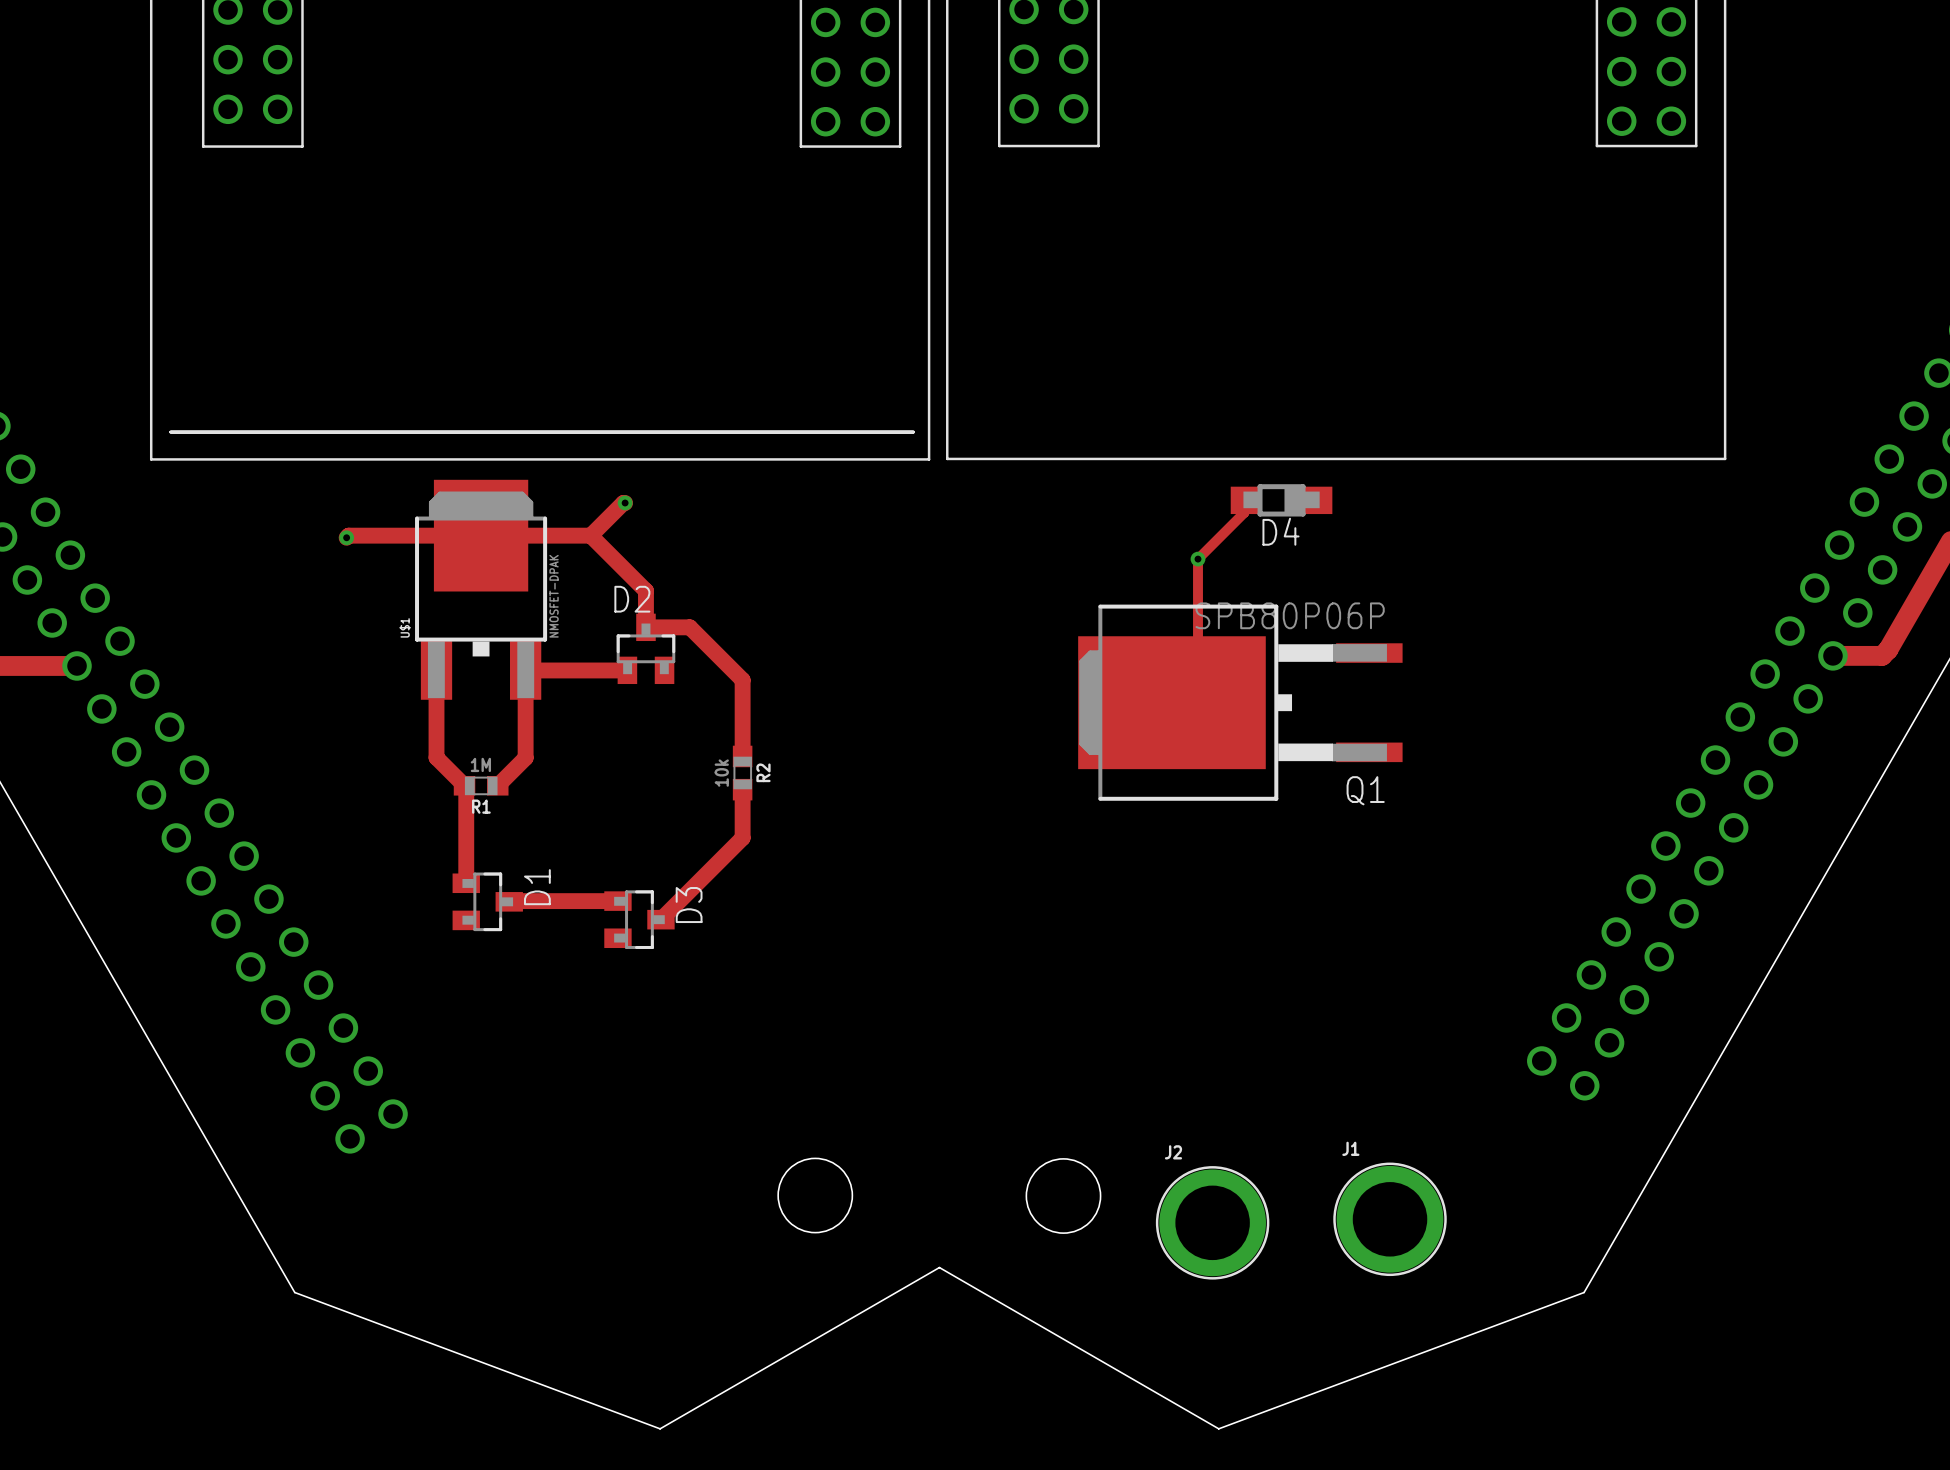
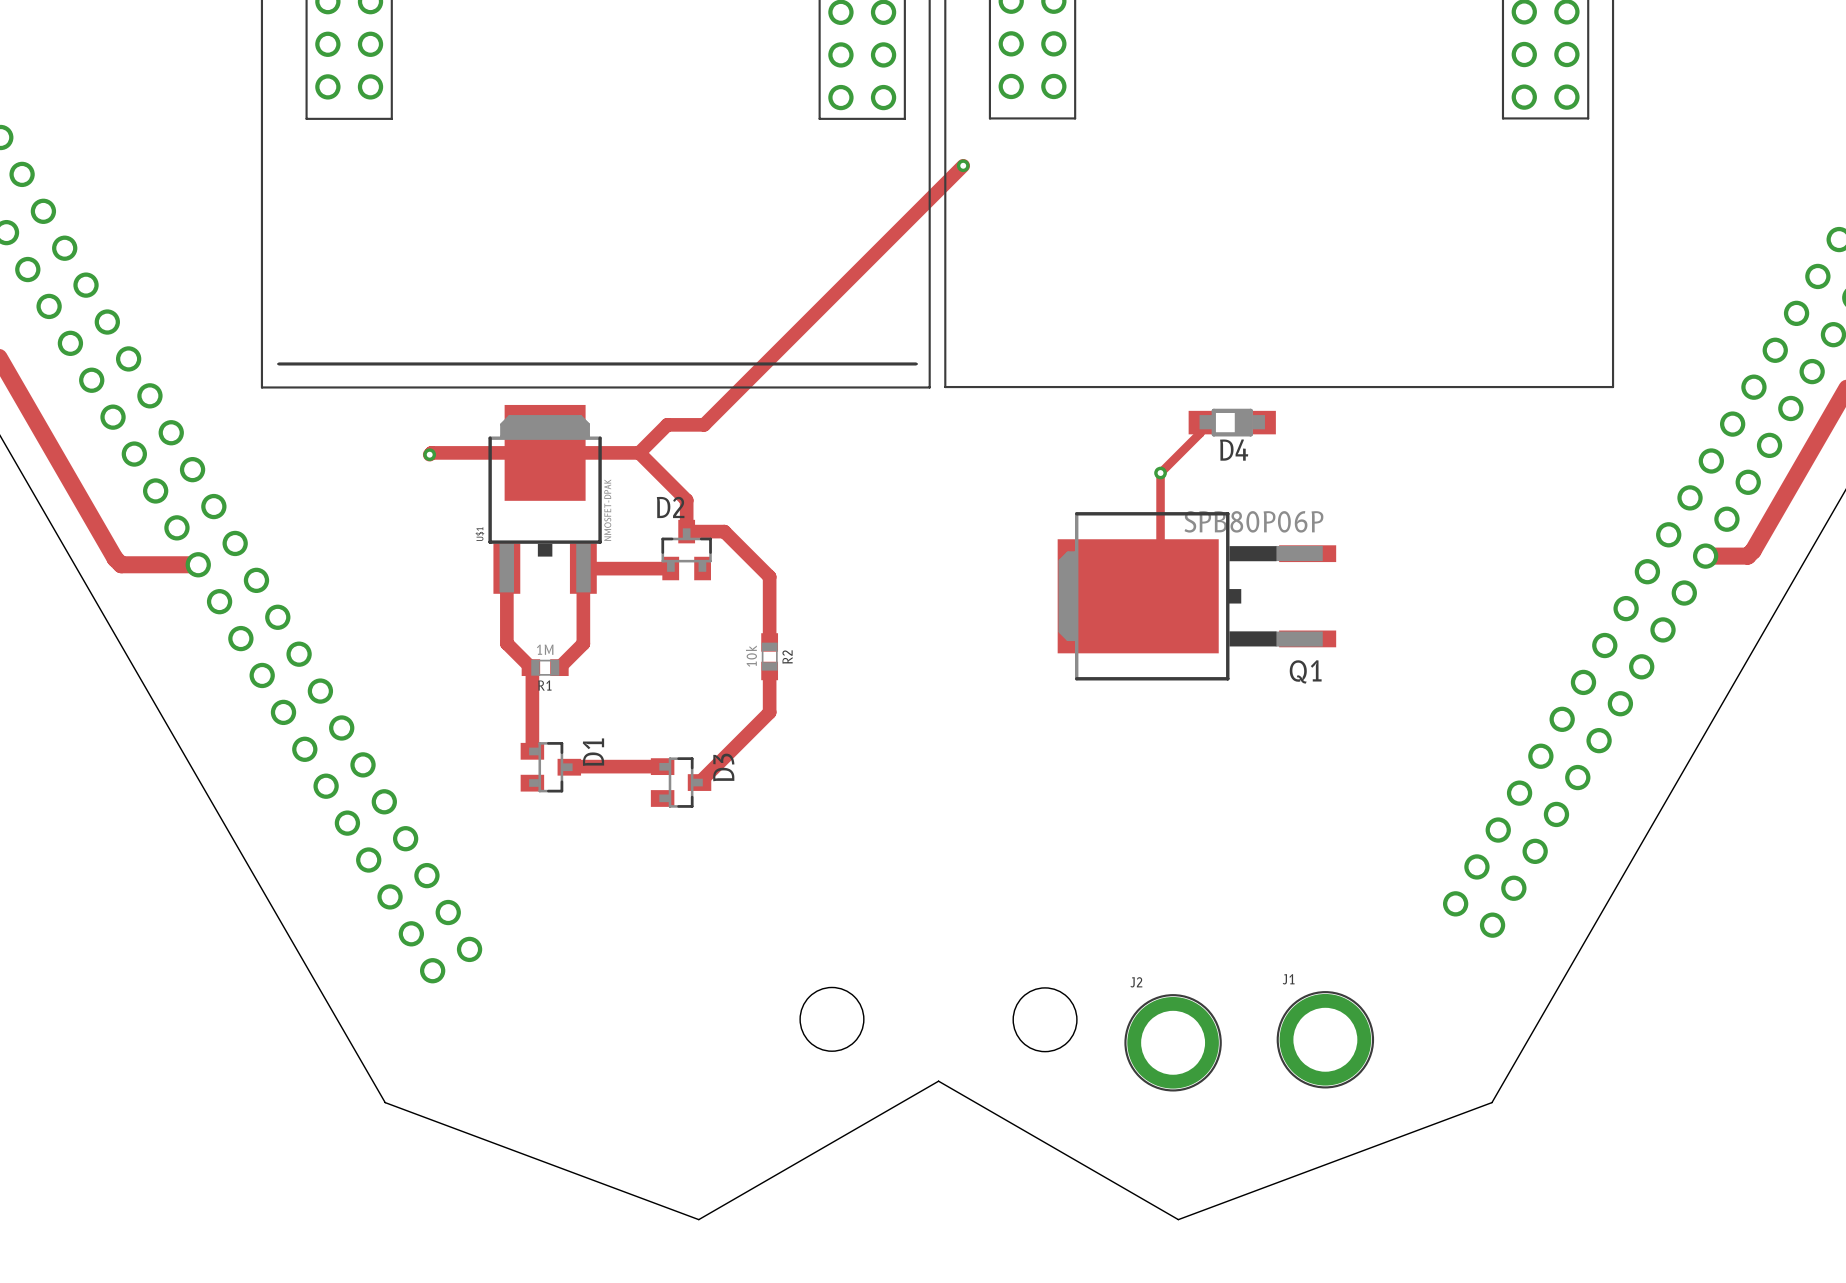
track: none -> (963, 165) (704, 424) (668, 424)
via: none -> (963, 165)
via: (625, 503) -> none

